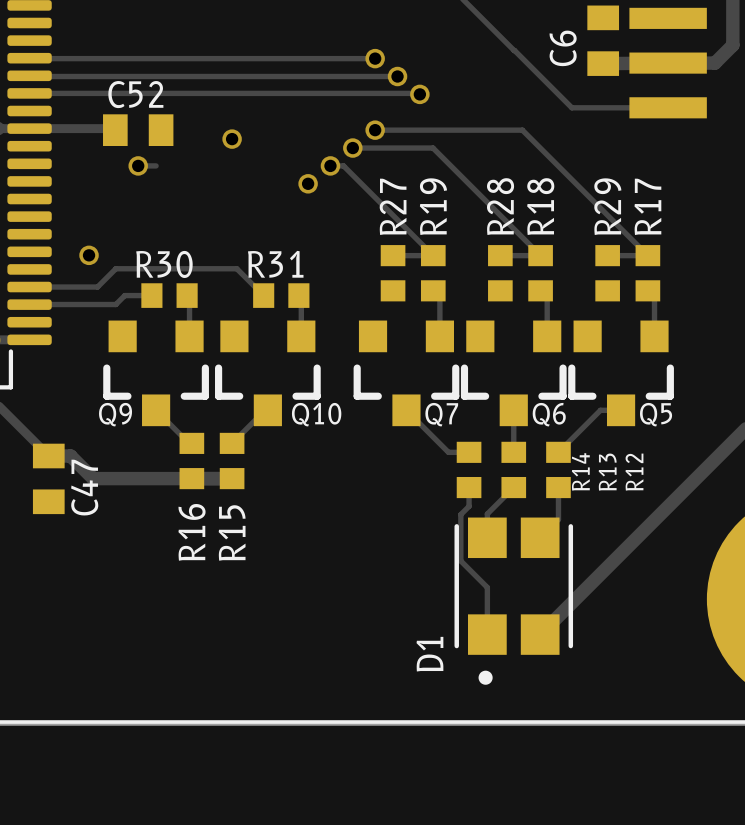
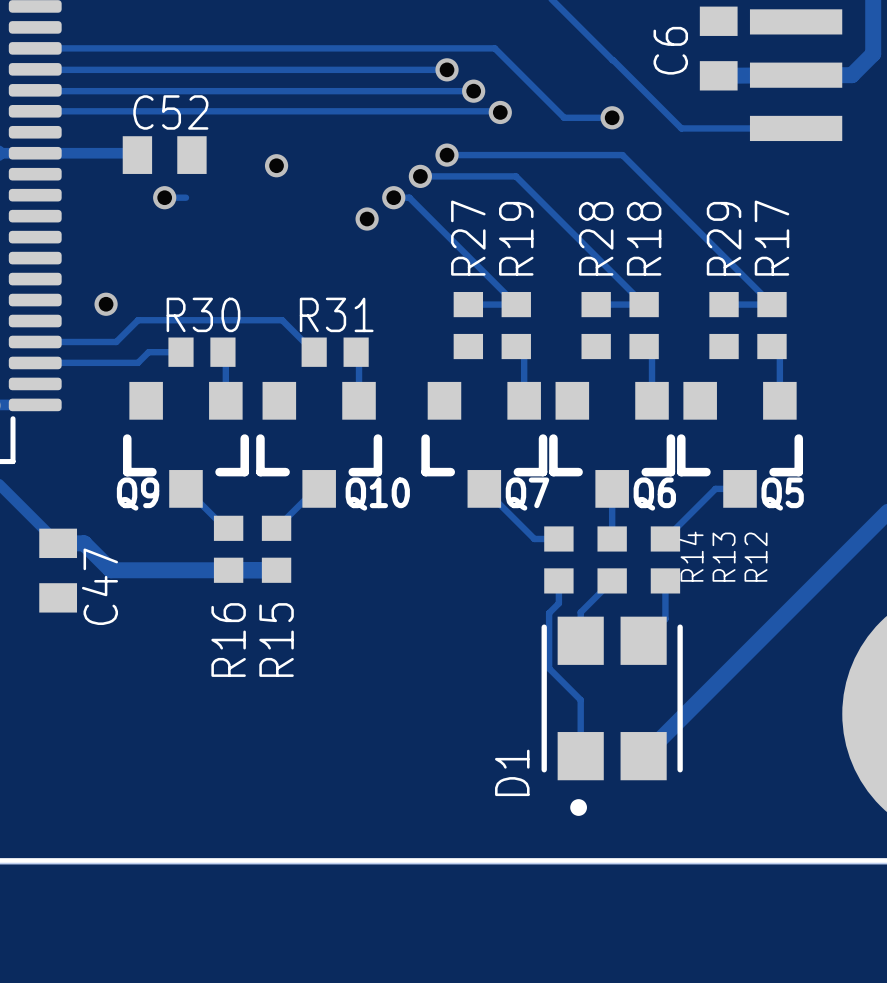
track: none -> (35, 48) (494, 48) (564, 117) (612, 117)
via: none -> (612, 117)

